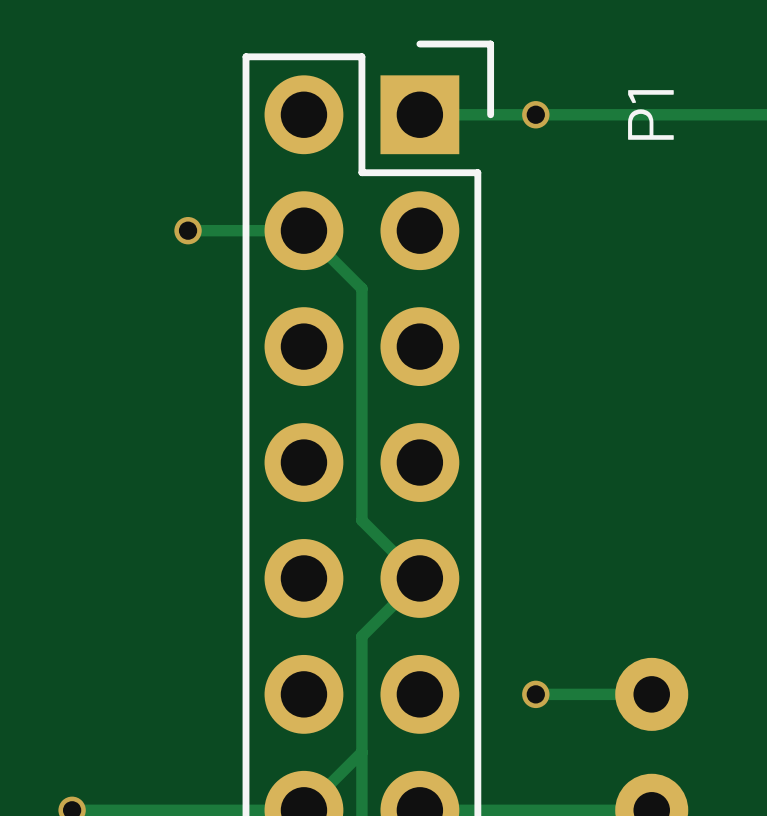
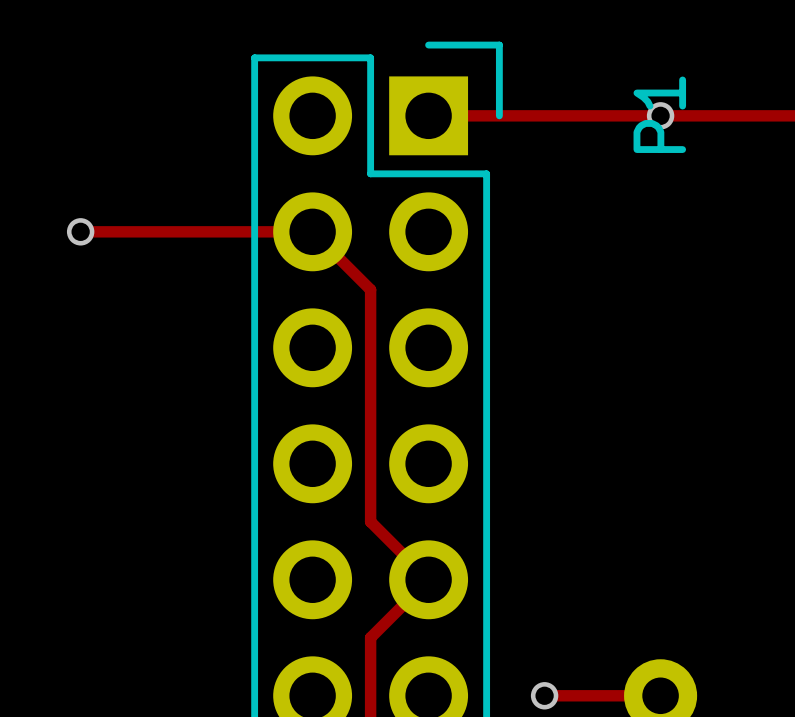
via: (535, 114) -> none
via: none -> (660, 115)
track: none -> (80, 231) (196, 231)
via position: (188, 230) -> (80, 231)

